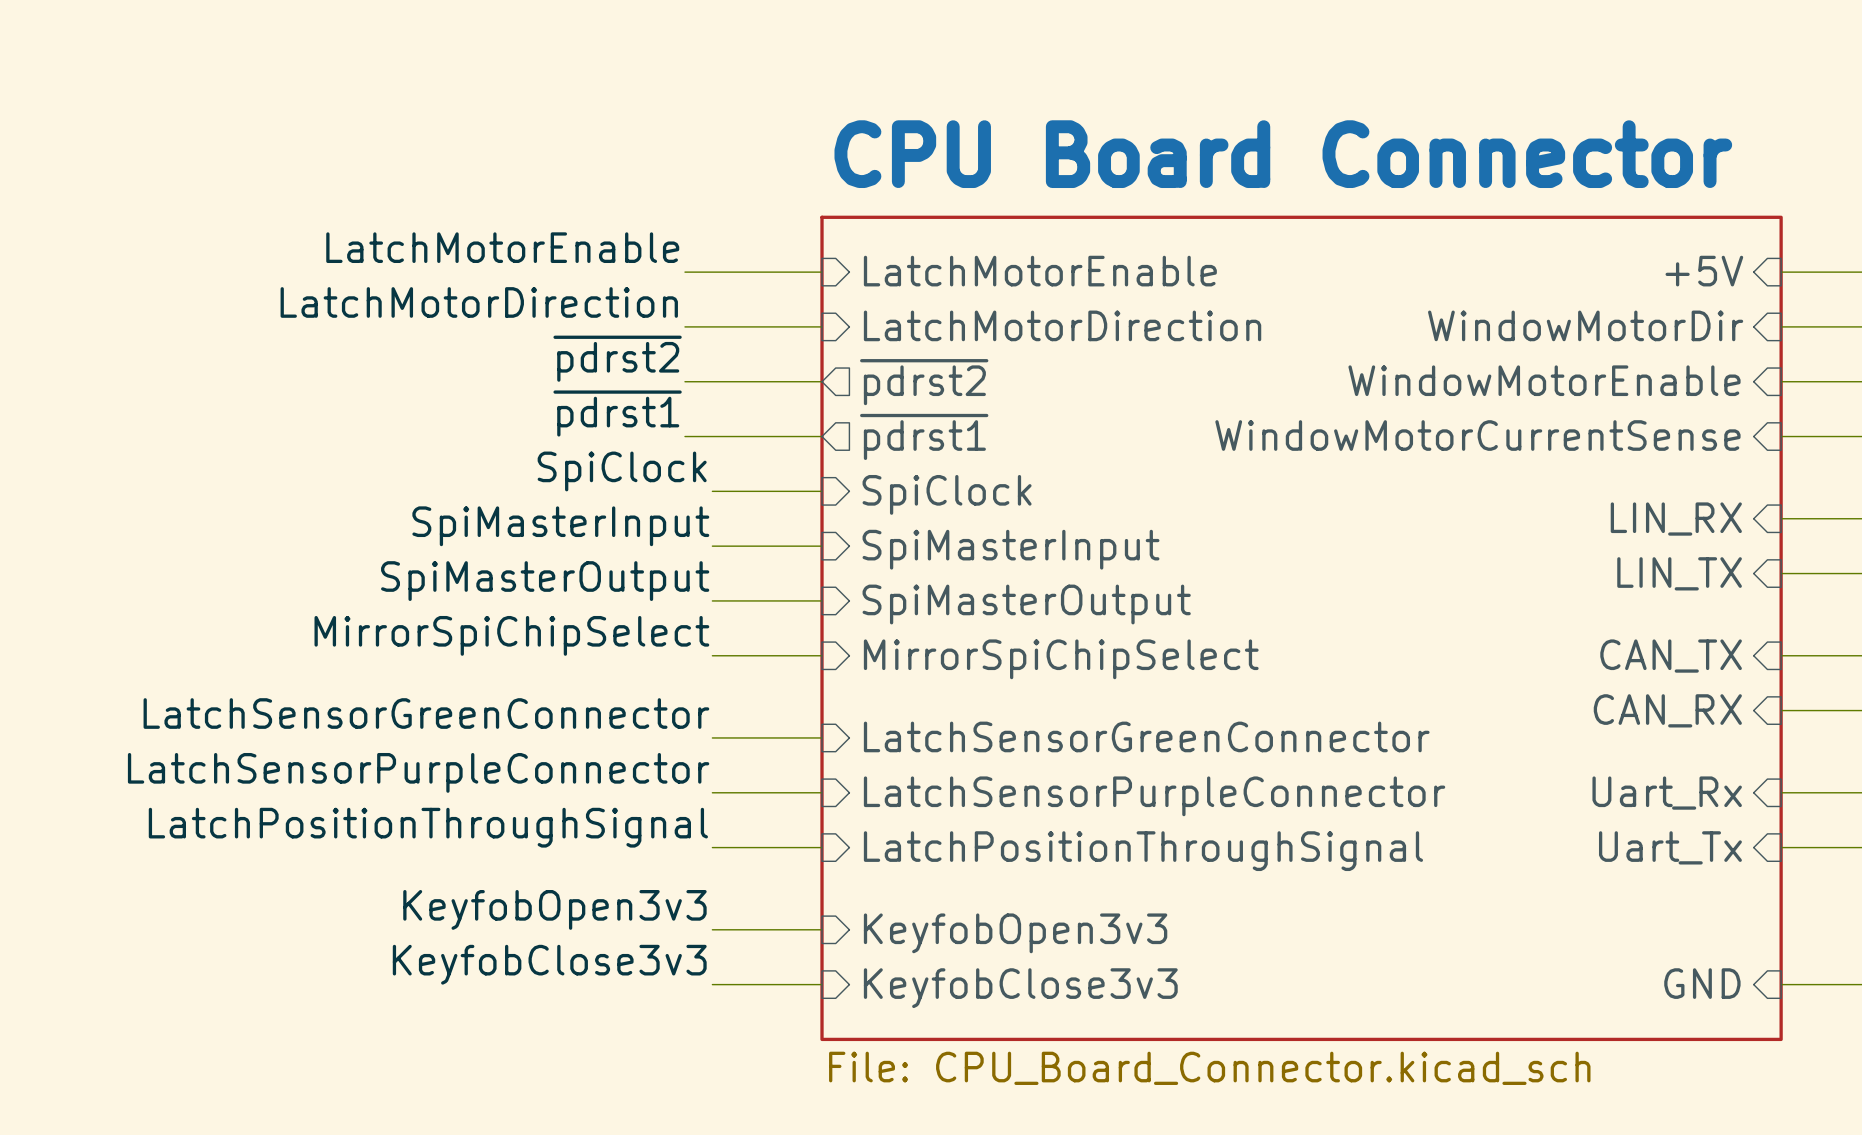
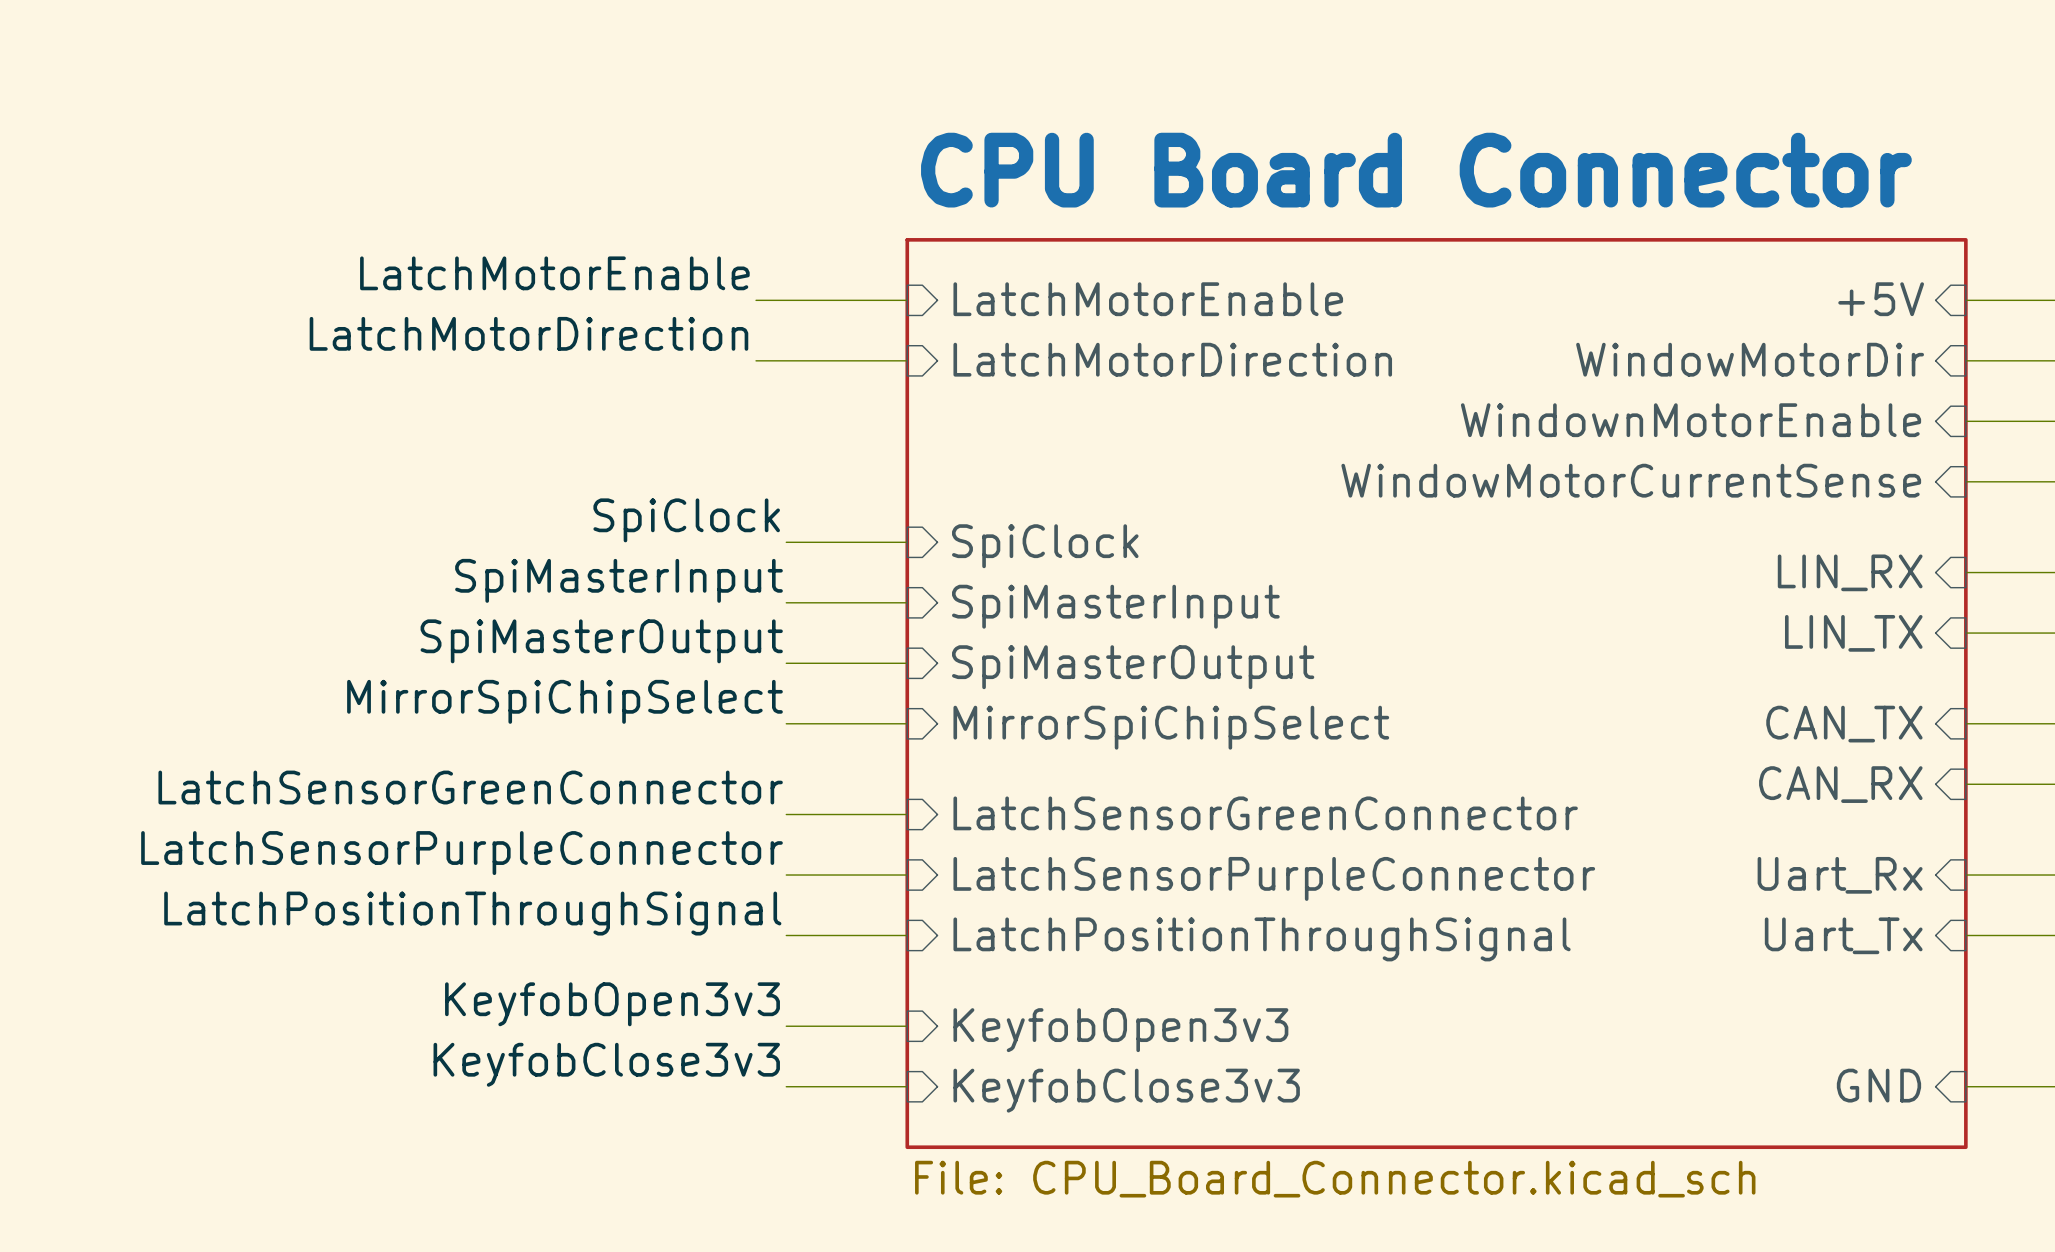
label: ~{pdrst2} (617, 358) -> none
sheet pin: WindowMotorEnable (1544, 380) -> WindownMotorEnable (1691, 420)
wire: (684, 381) (822, 381) -> none
sheet pin: ~{pdrst2} (924, 382) -> none
label: ~{pdrst1} (617, 413) -> none
wire: (684, 436) (822, 436) -> none
sheet pin: ~{pdrst1} (924, 436) -> none

